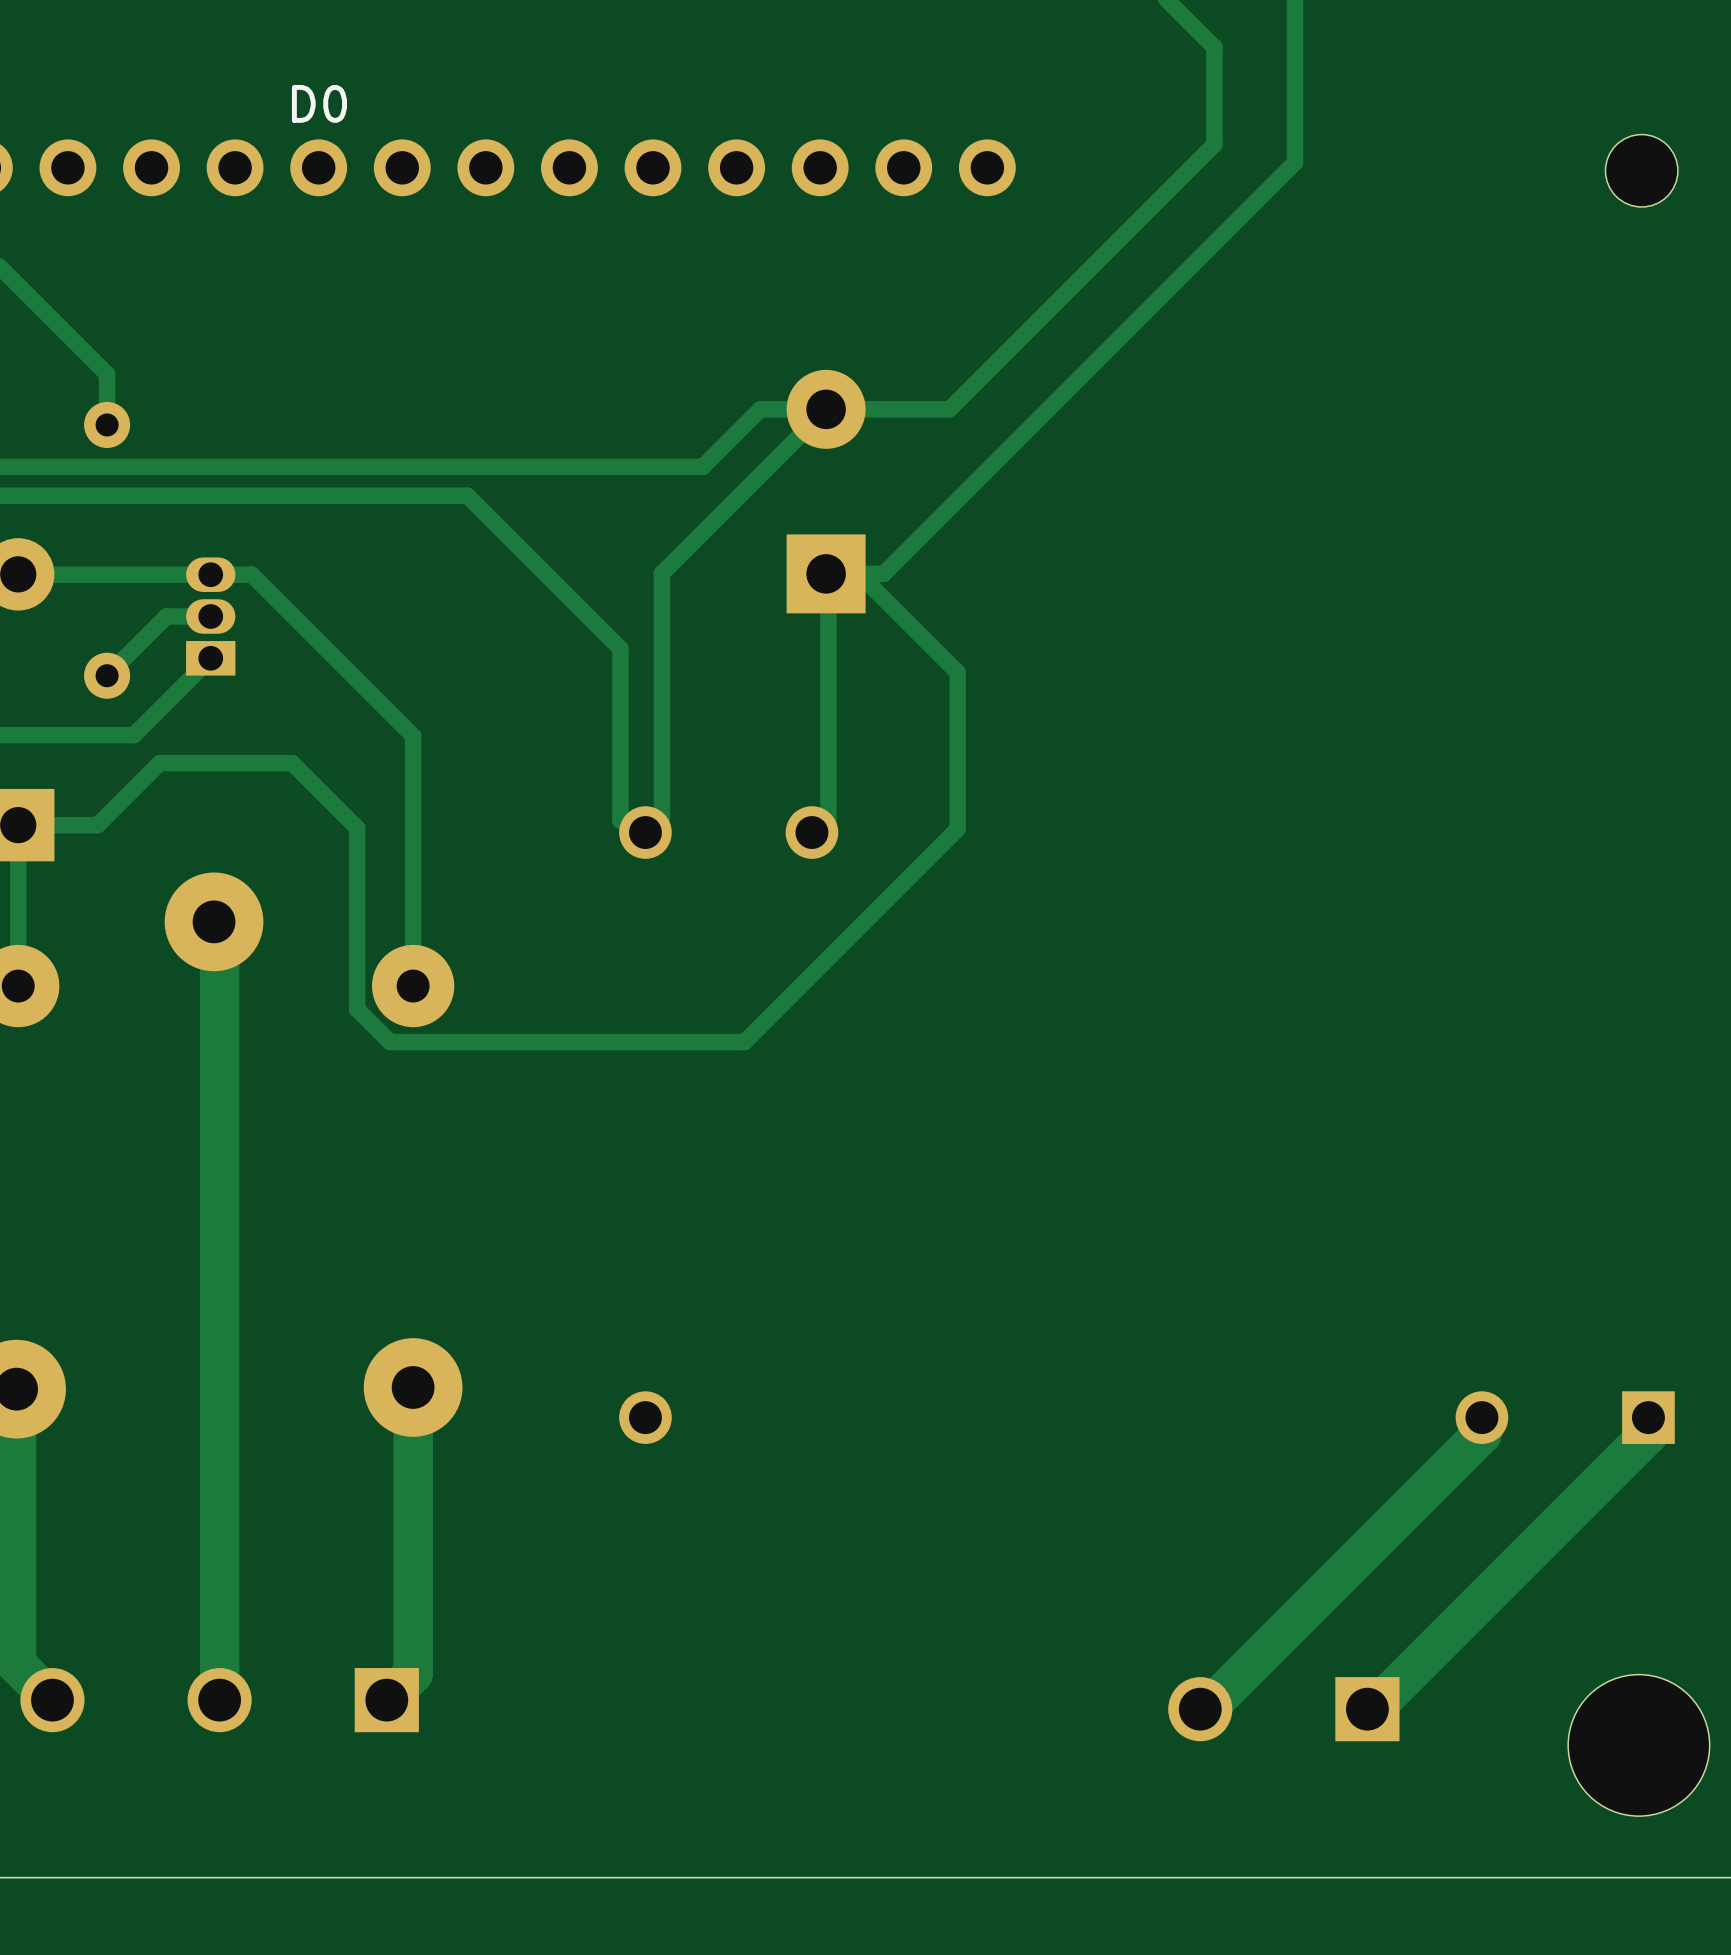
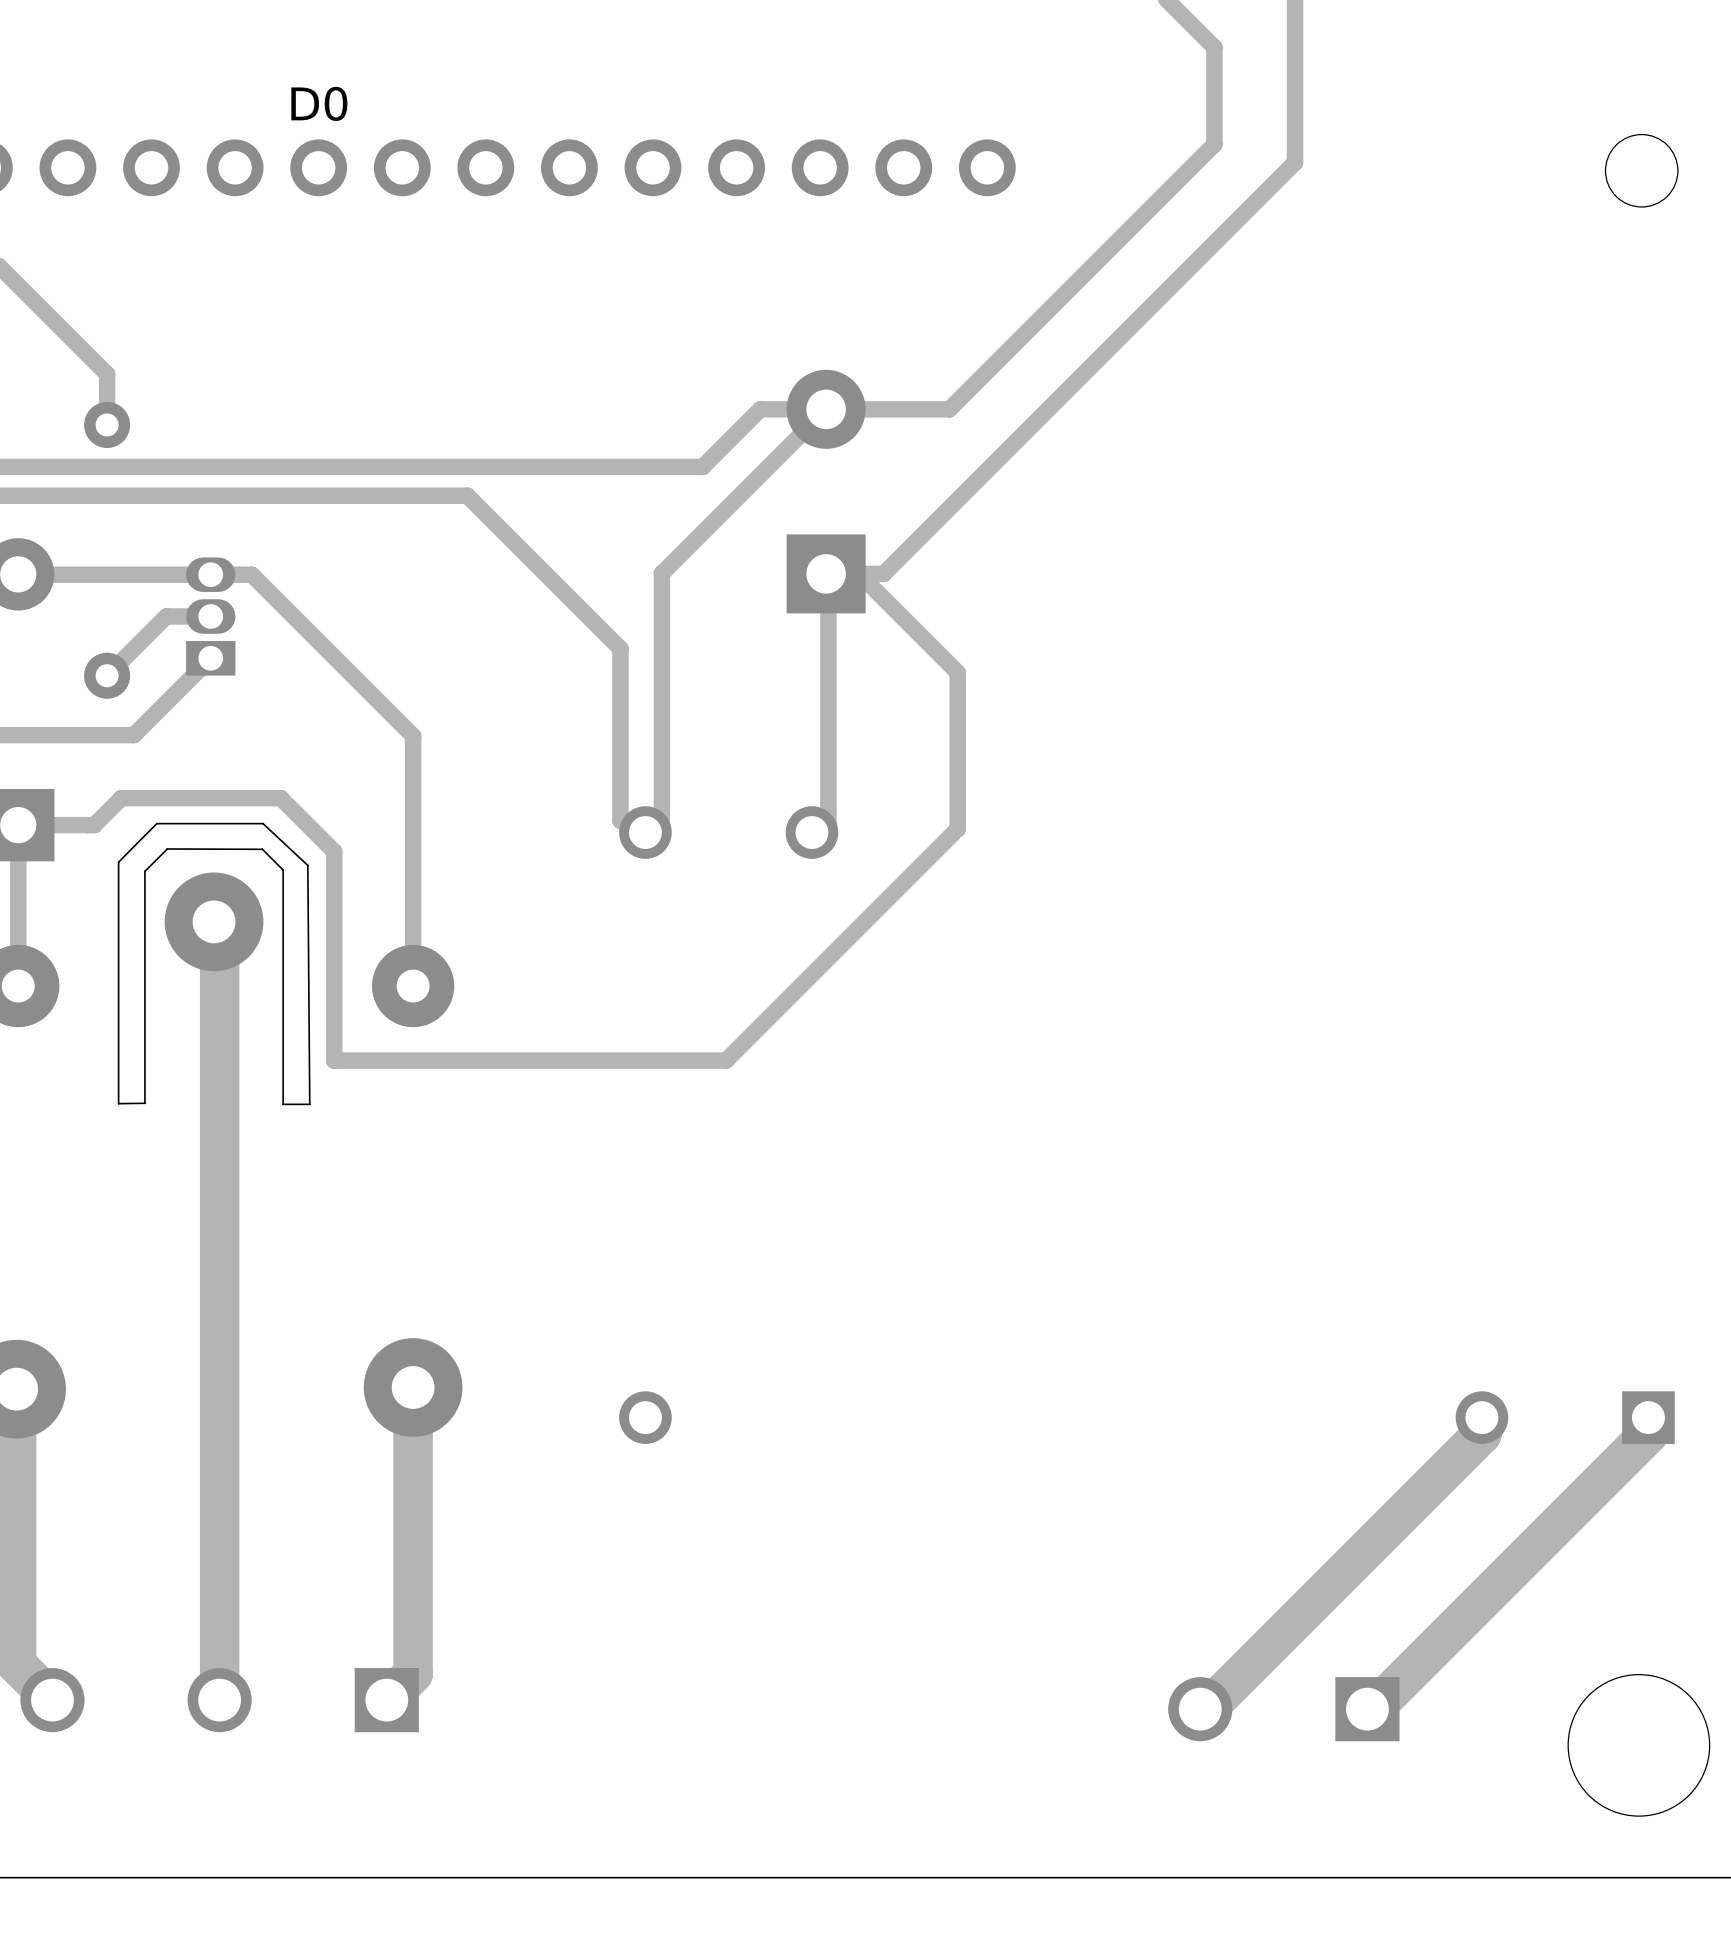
board edge: none -> (263, 823) (156, 823) (118, 862) (118, 1103) (144, 1103) (144, 871) (167, 848) (262, 849) (283, 870) (283, 1104) (309, 1104) (307, 865) (263, 823)
track: (94, 825) (97, 825) (159, 763) (292, 763) (357, 827) (357, 1009) (389, 1042) (744, 1042) -> (94, 825) (121, 798) (280, 798) (334, 851) (334, 1060) (726, 1060) (744, 1042)

